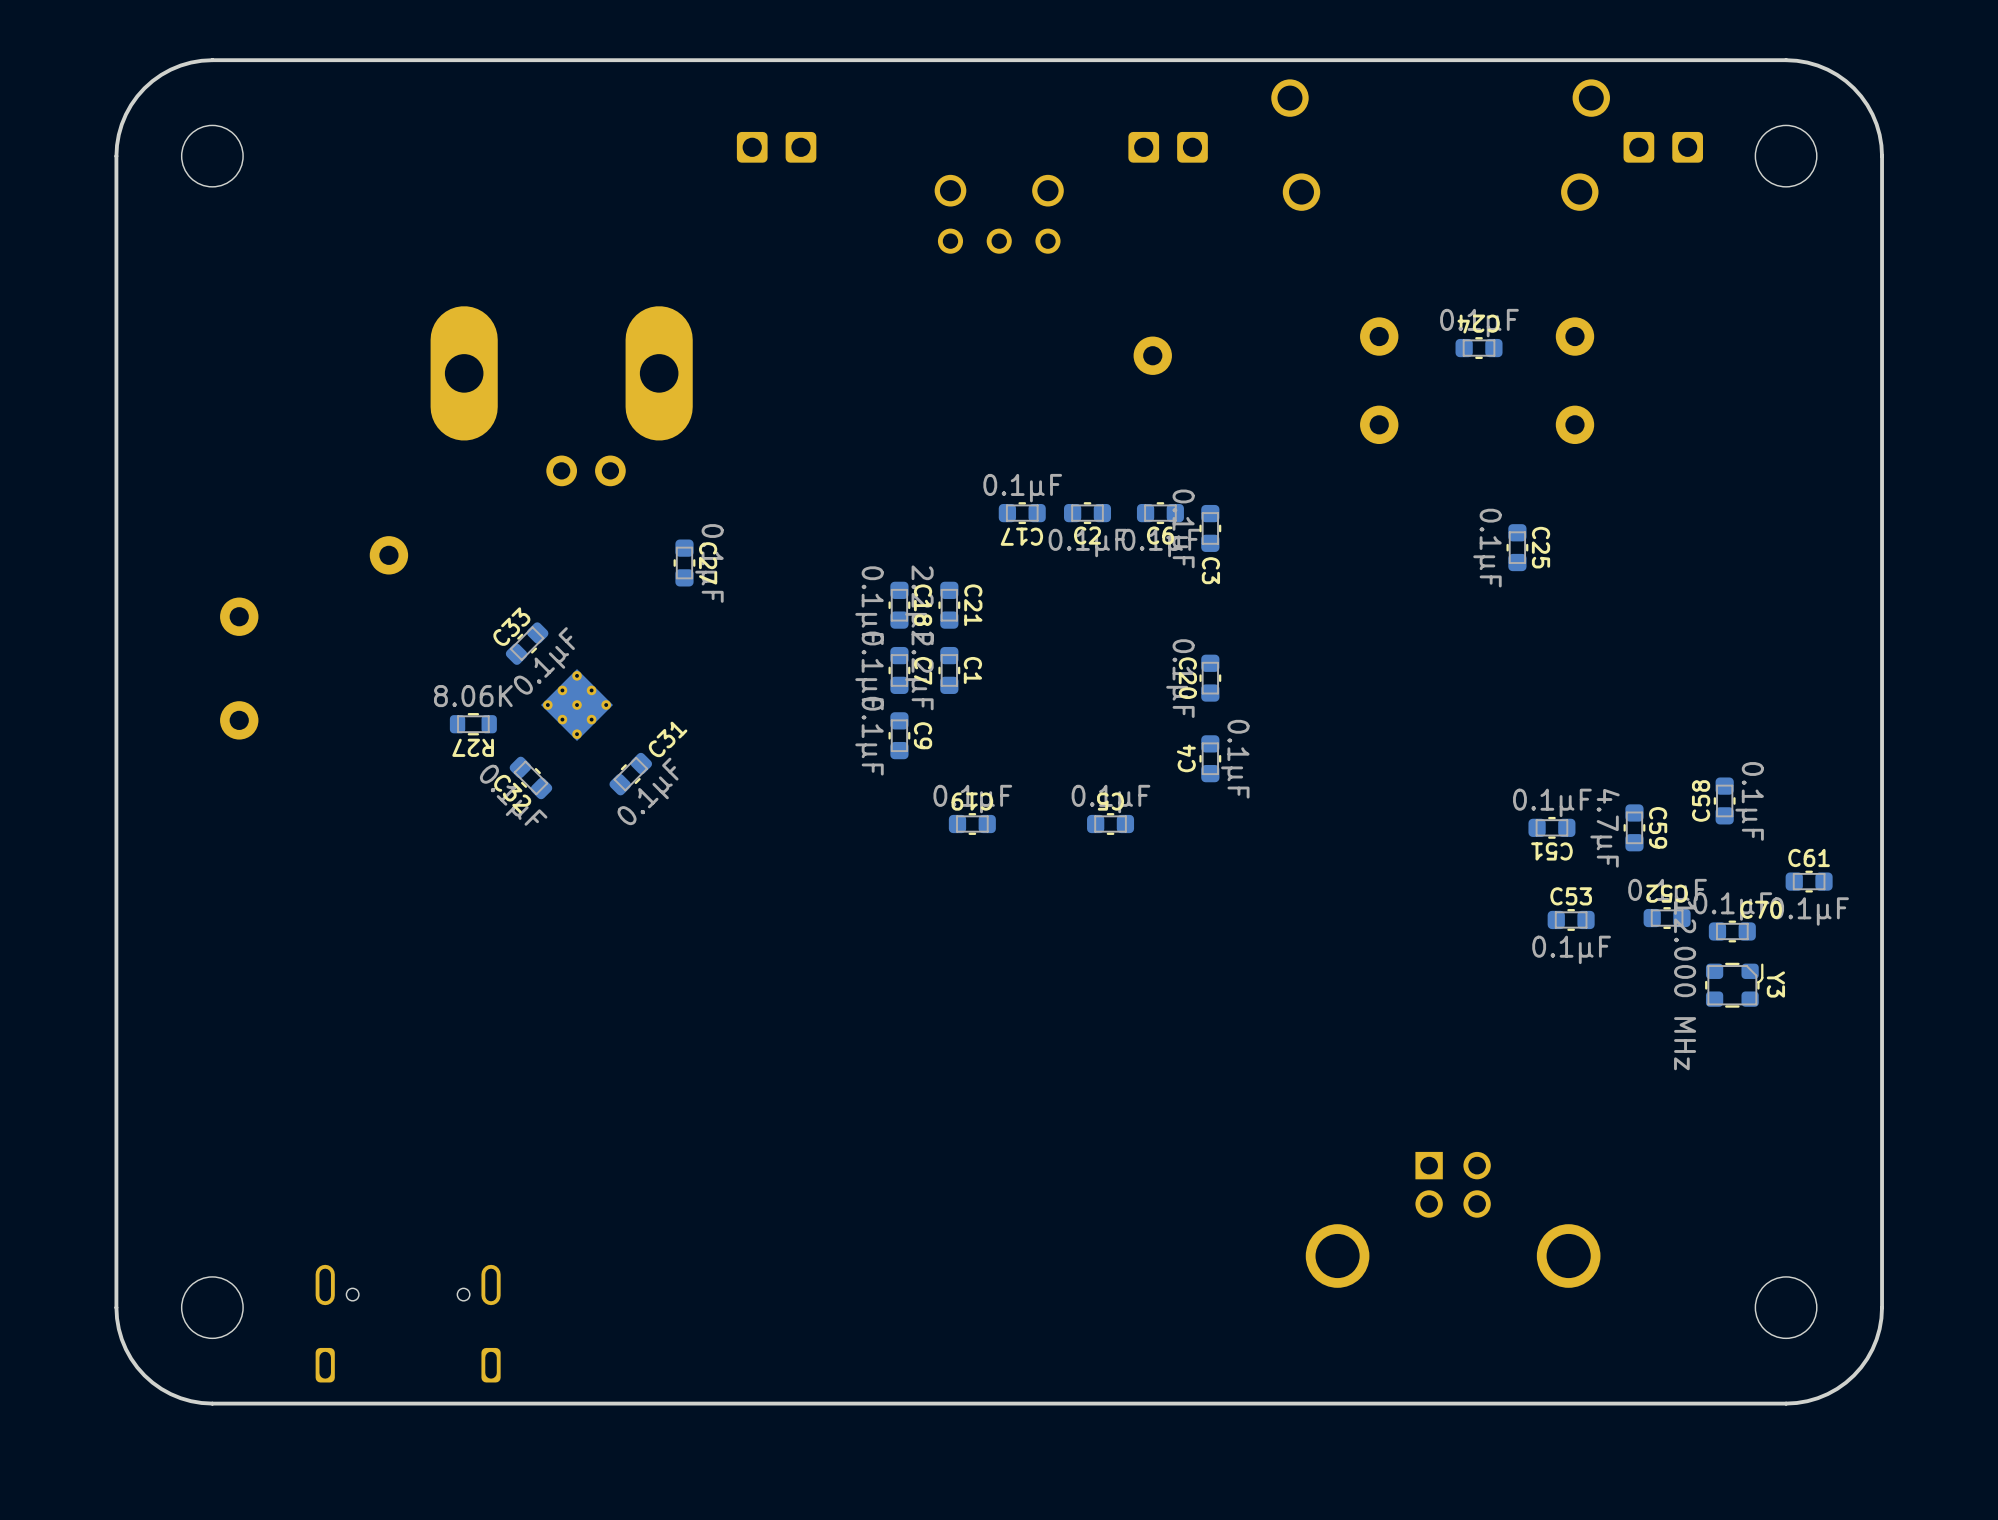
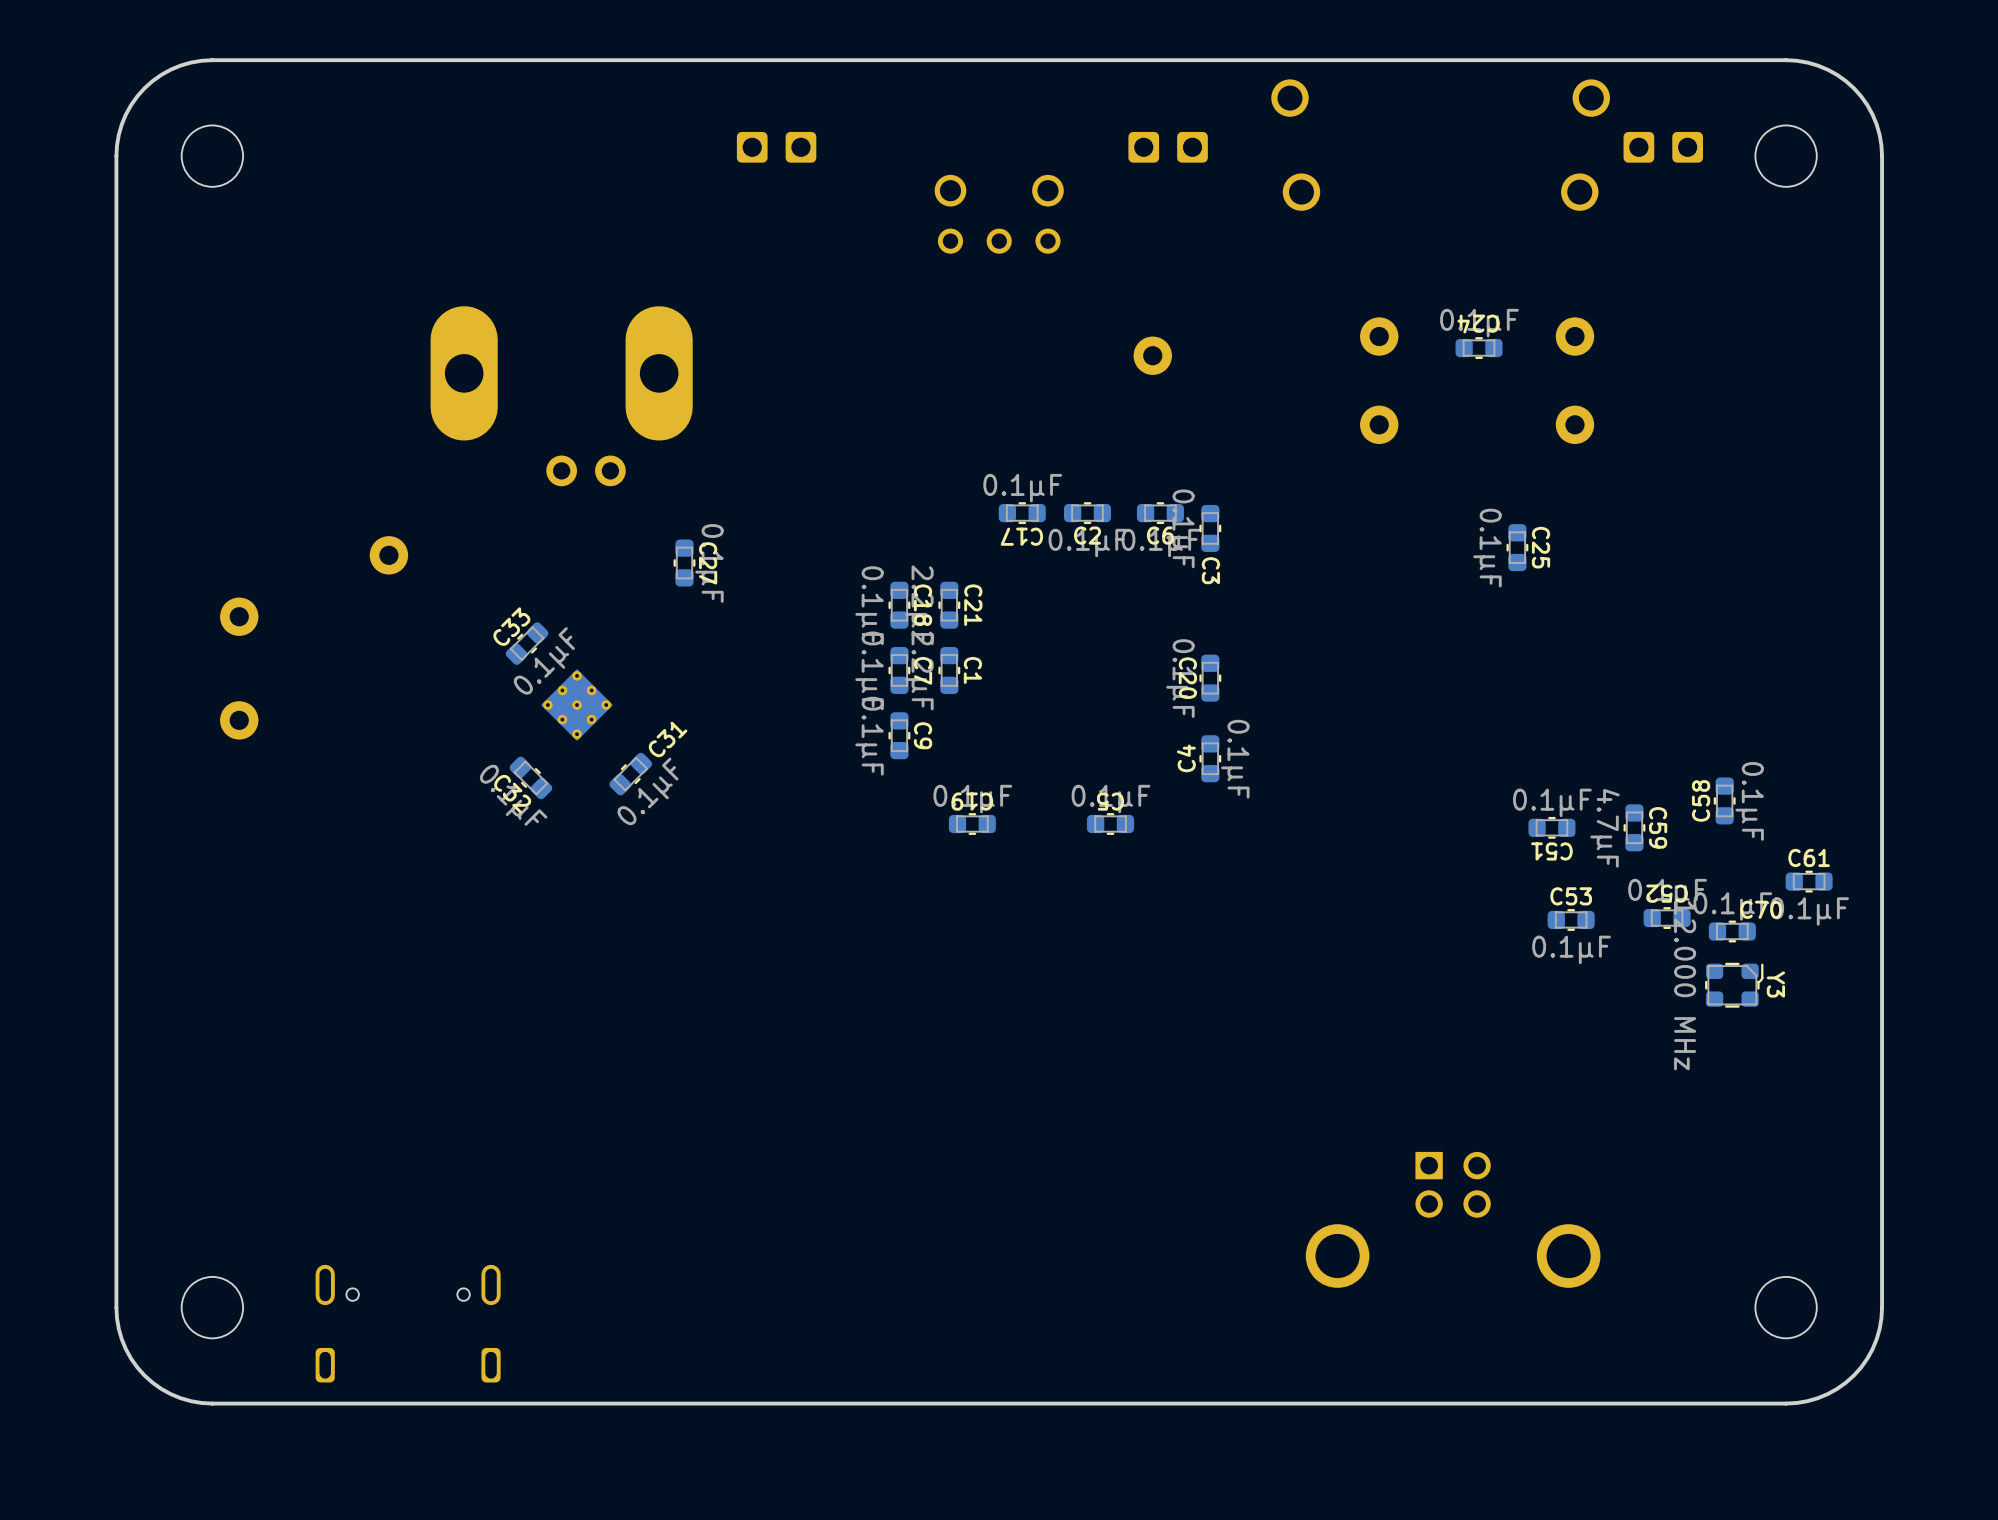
R27: 8.06K (473, 724) -> none

